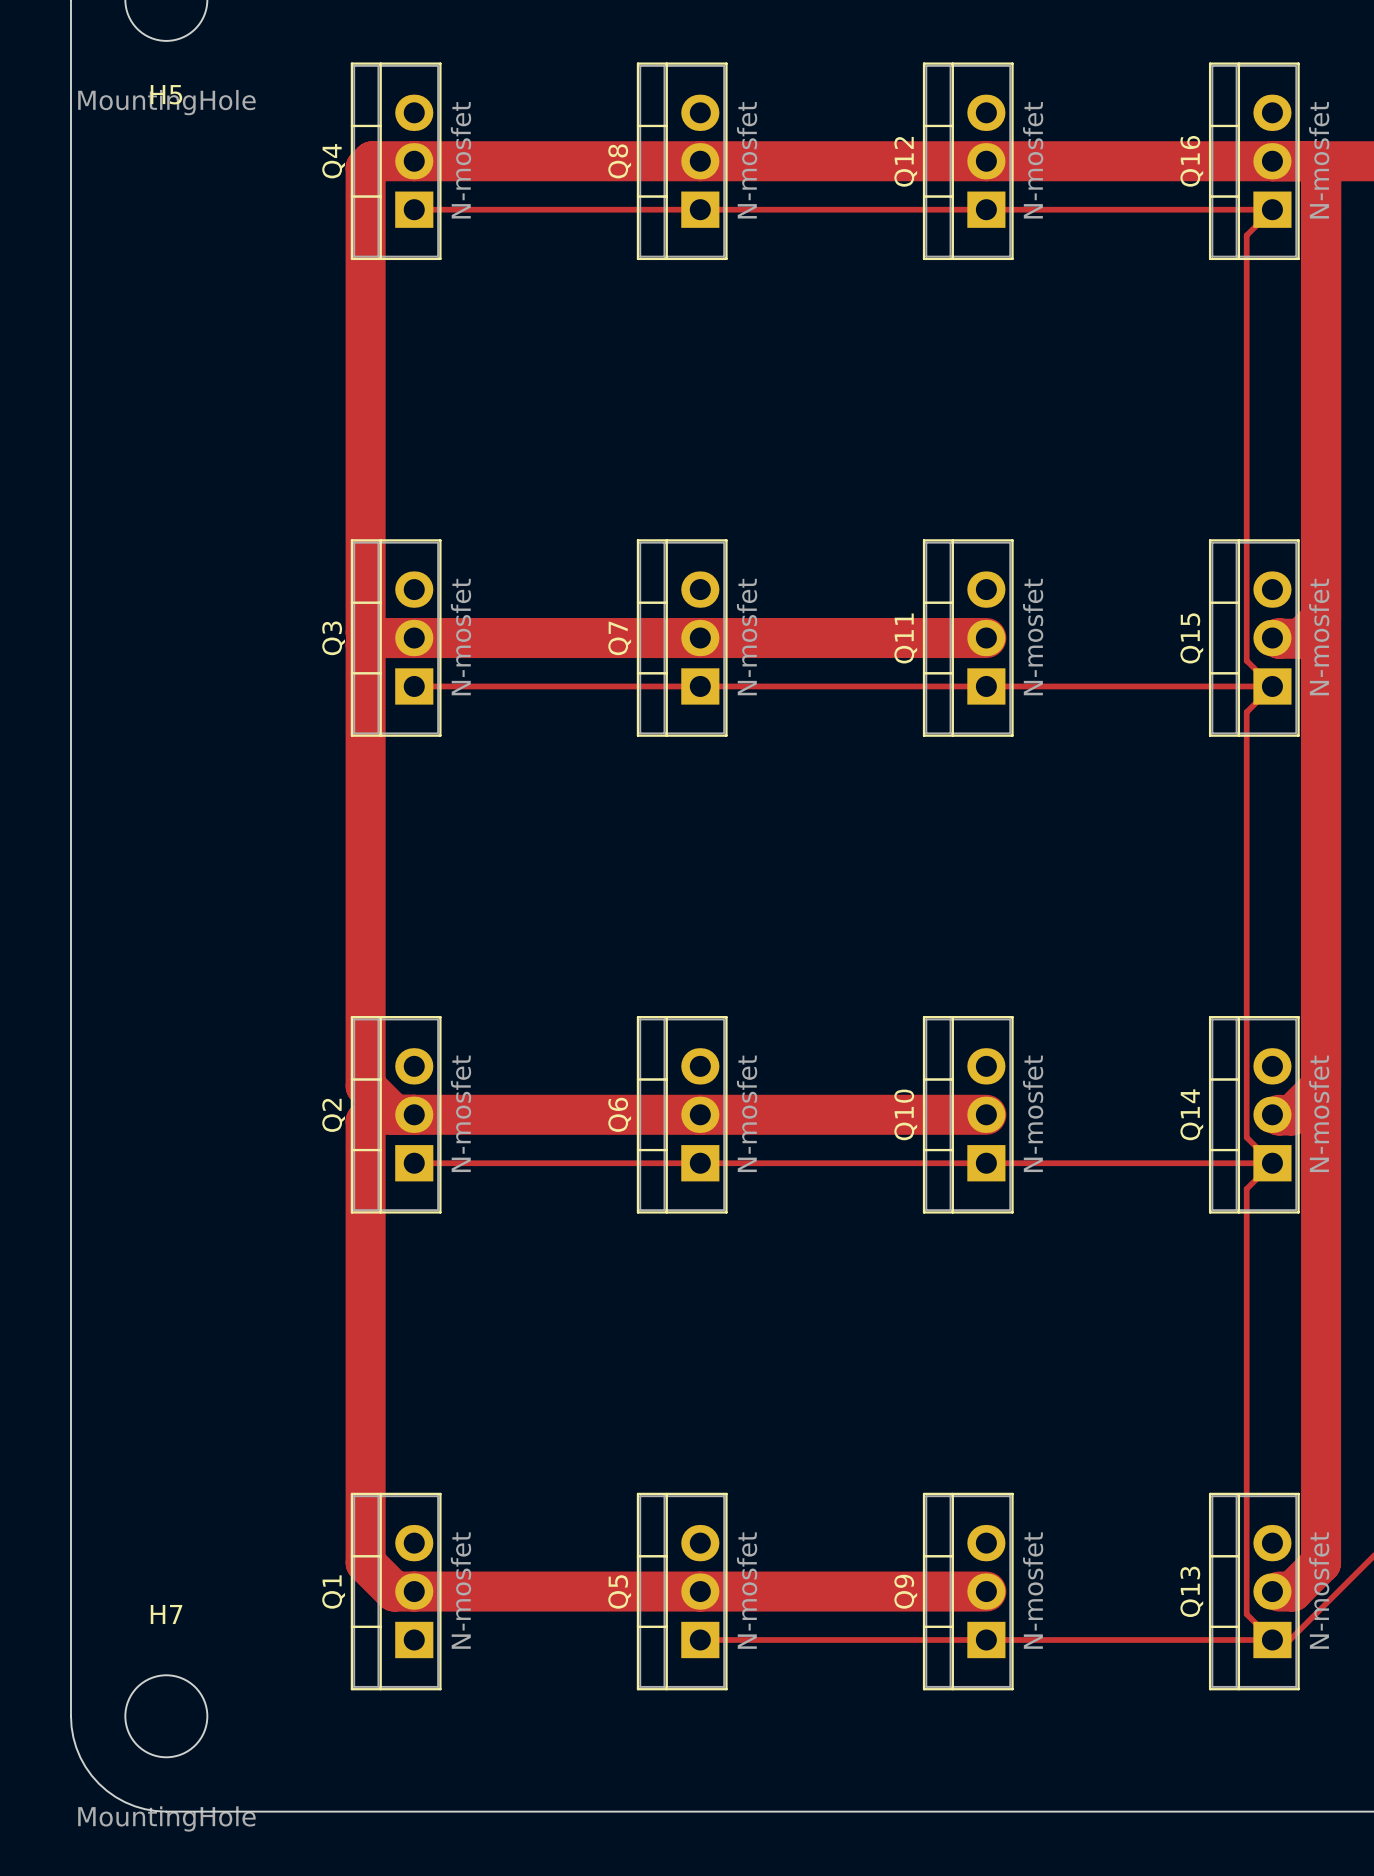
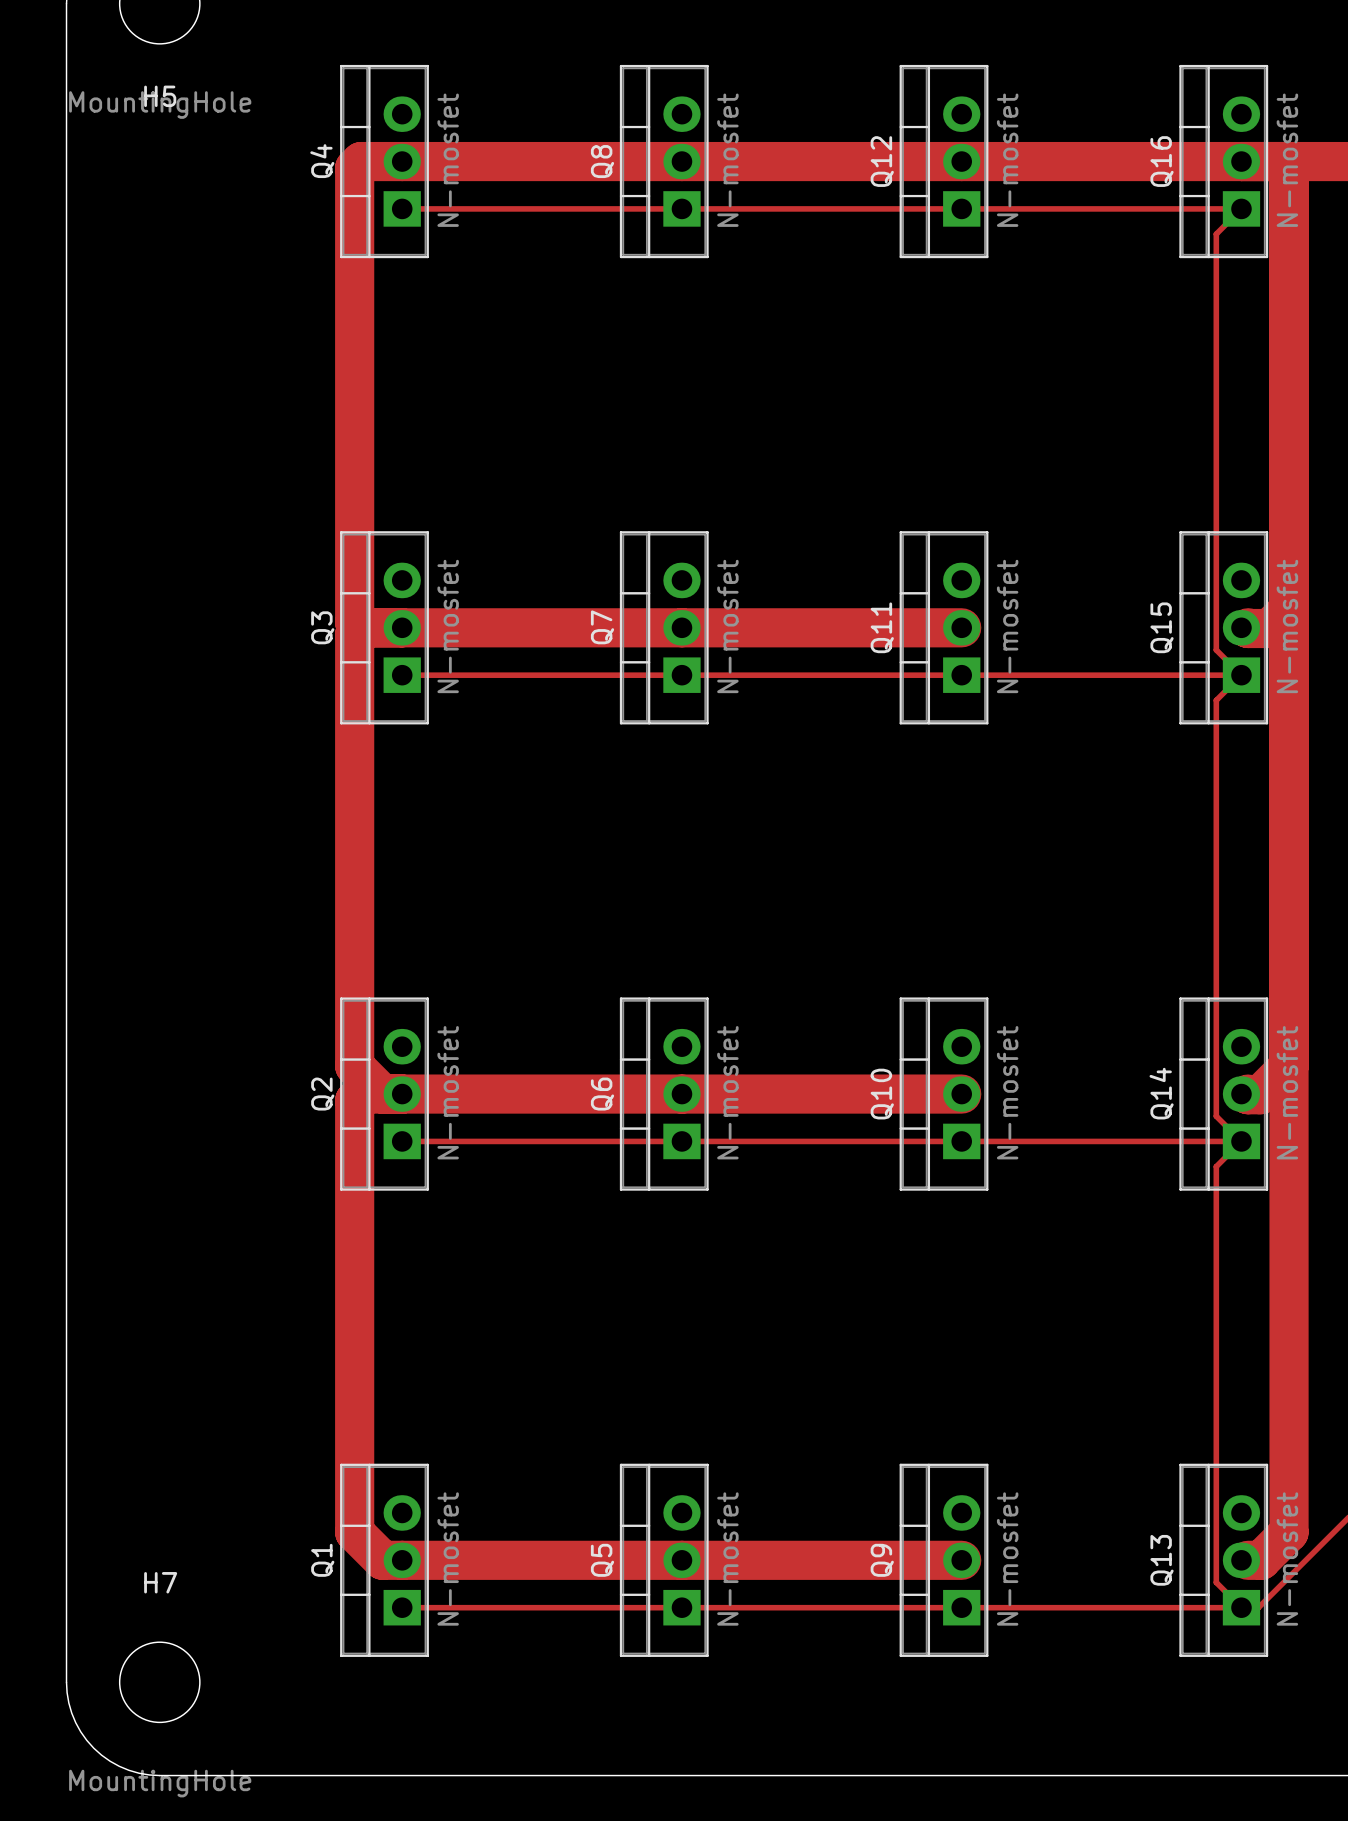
top track: none -> (402, 1607) (681, 1607)

